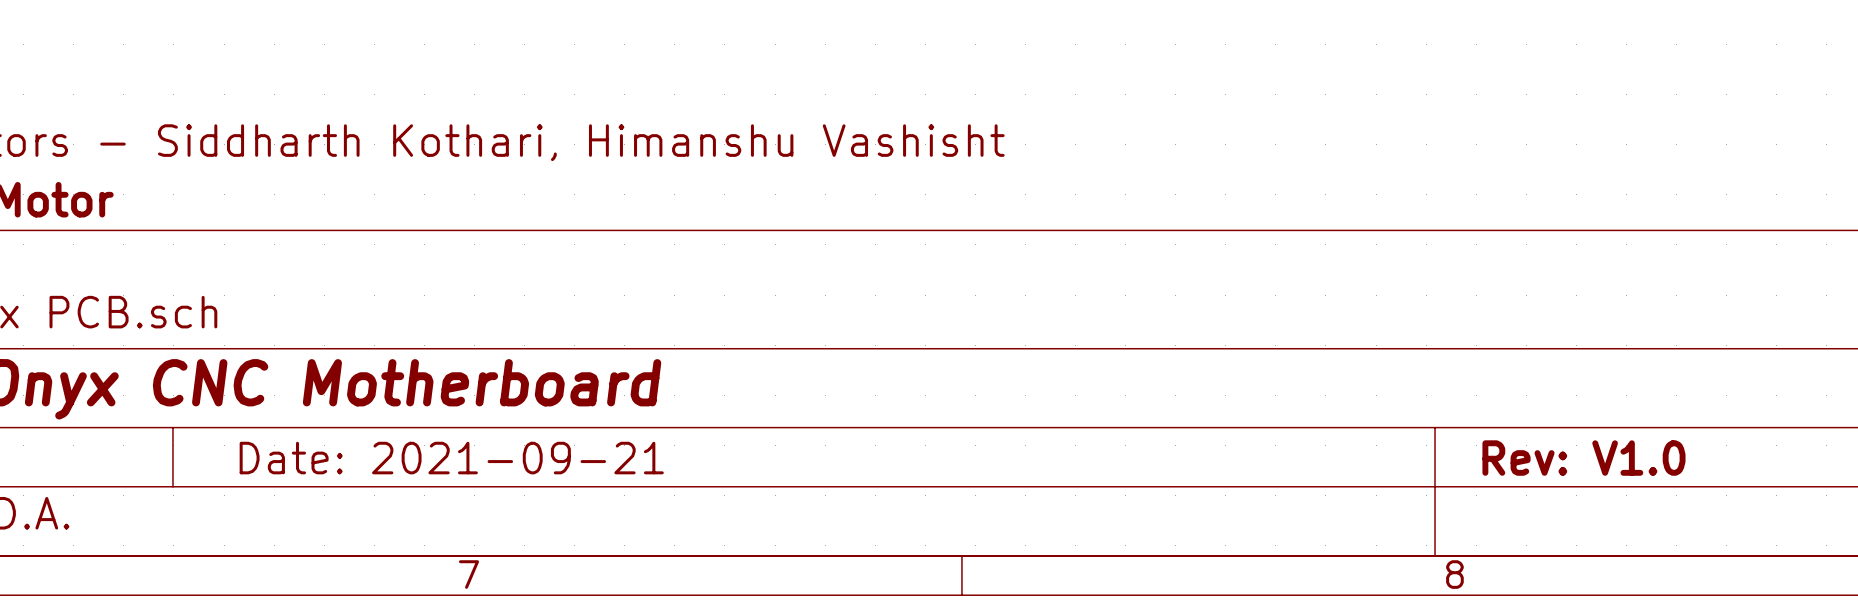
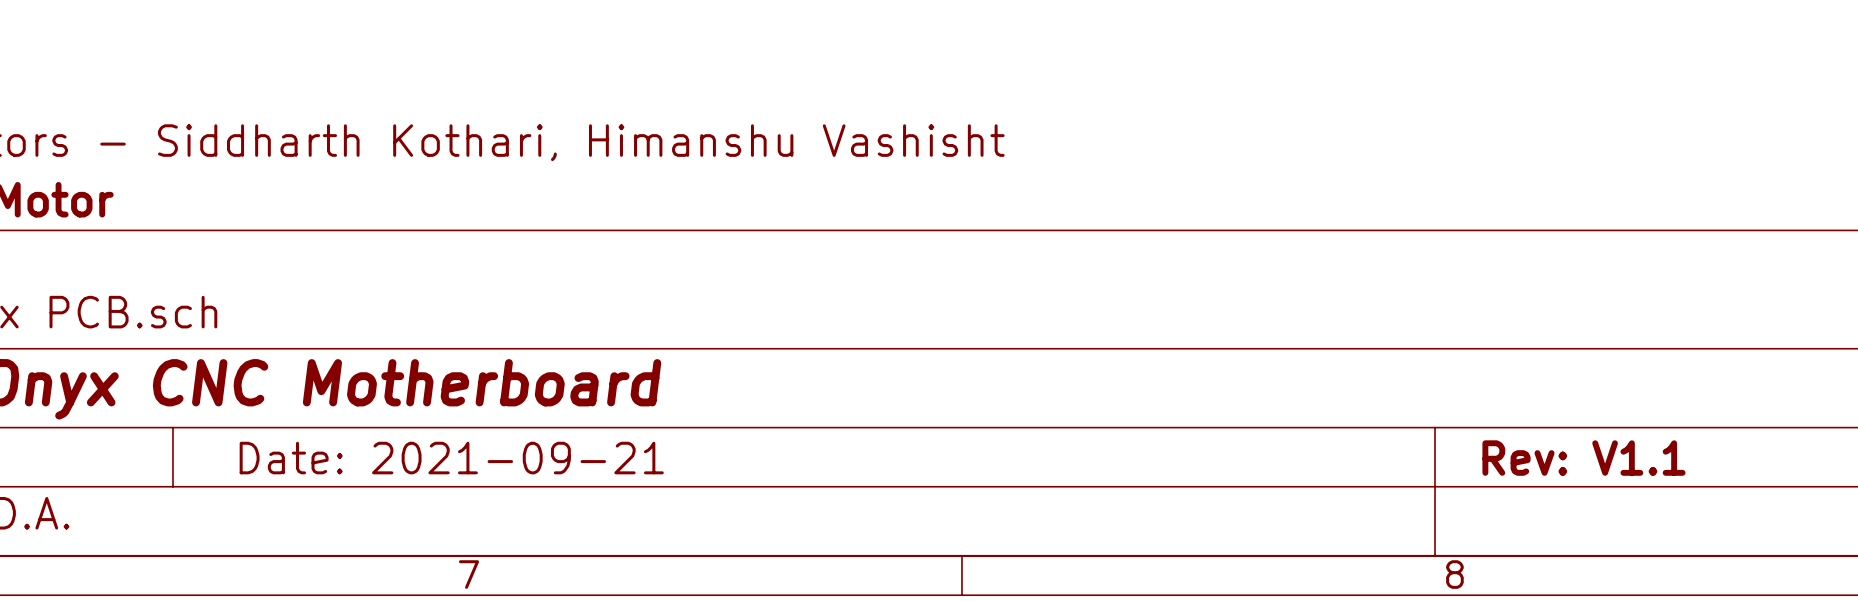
title block: Rev: V1.0 (1583, 458) -> Rev: V1.1 (1583, 458)

